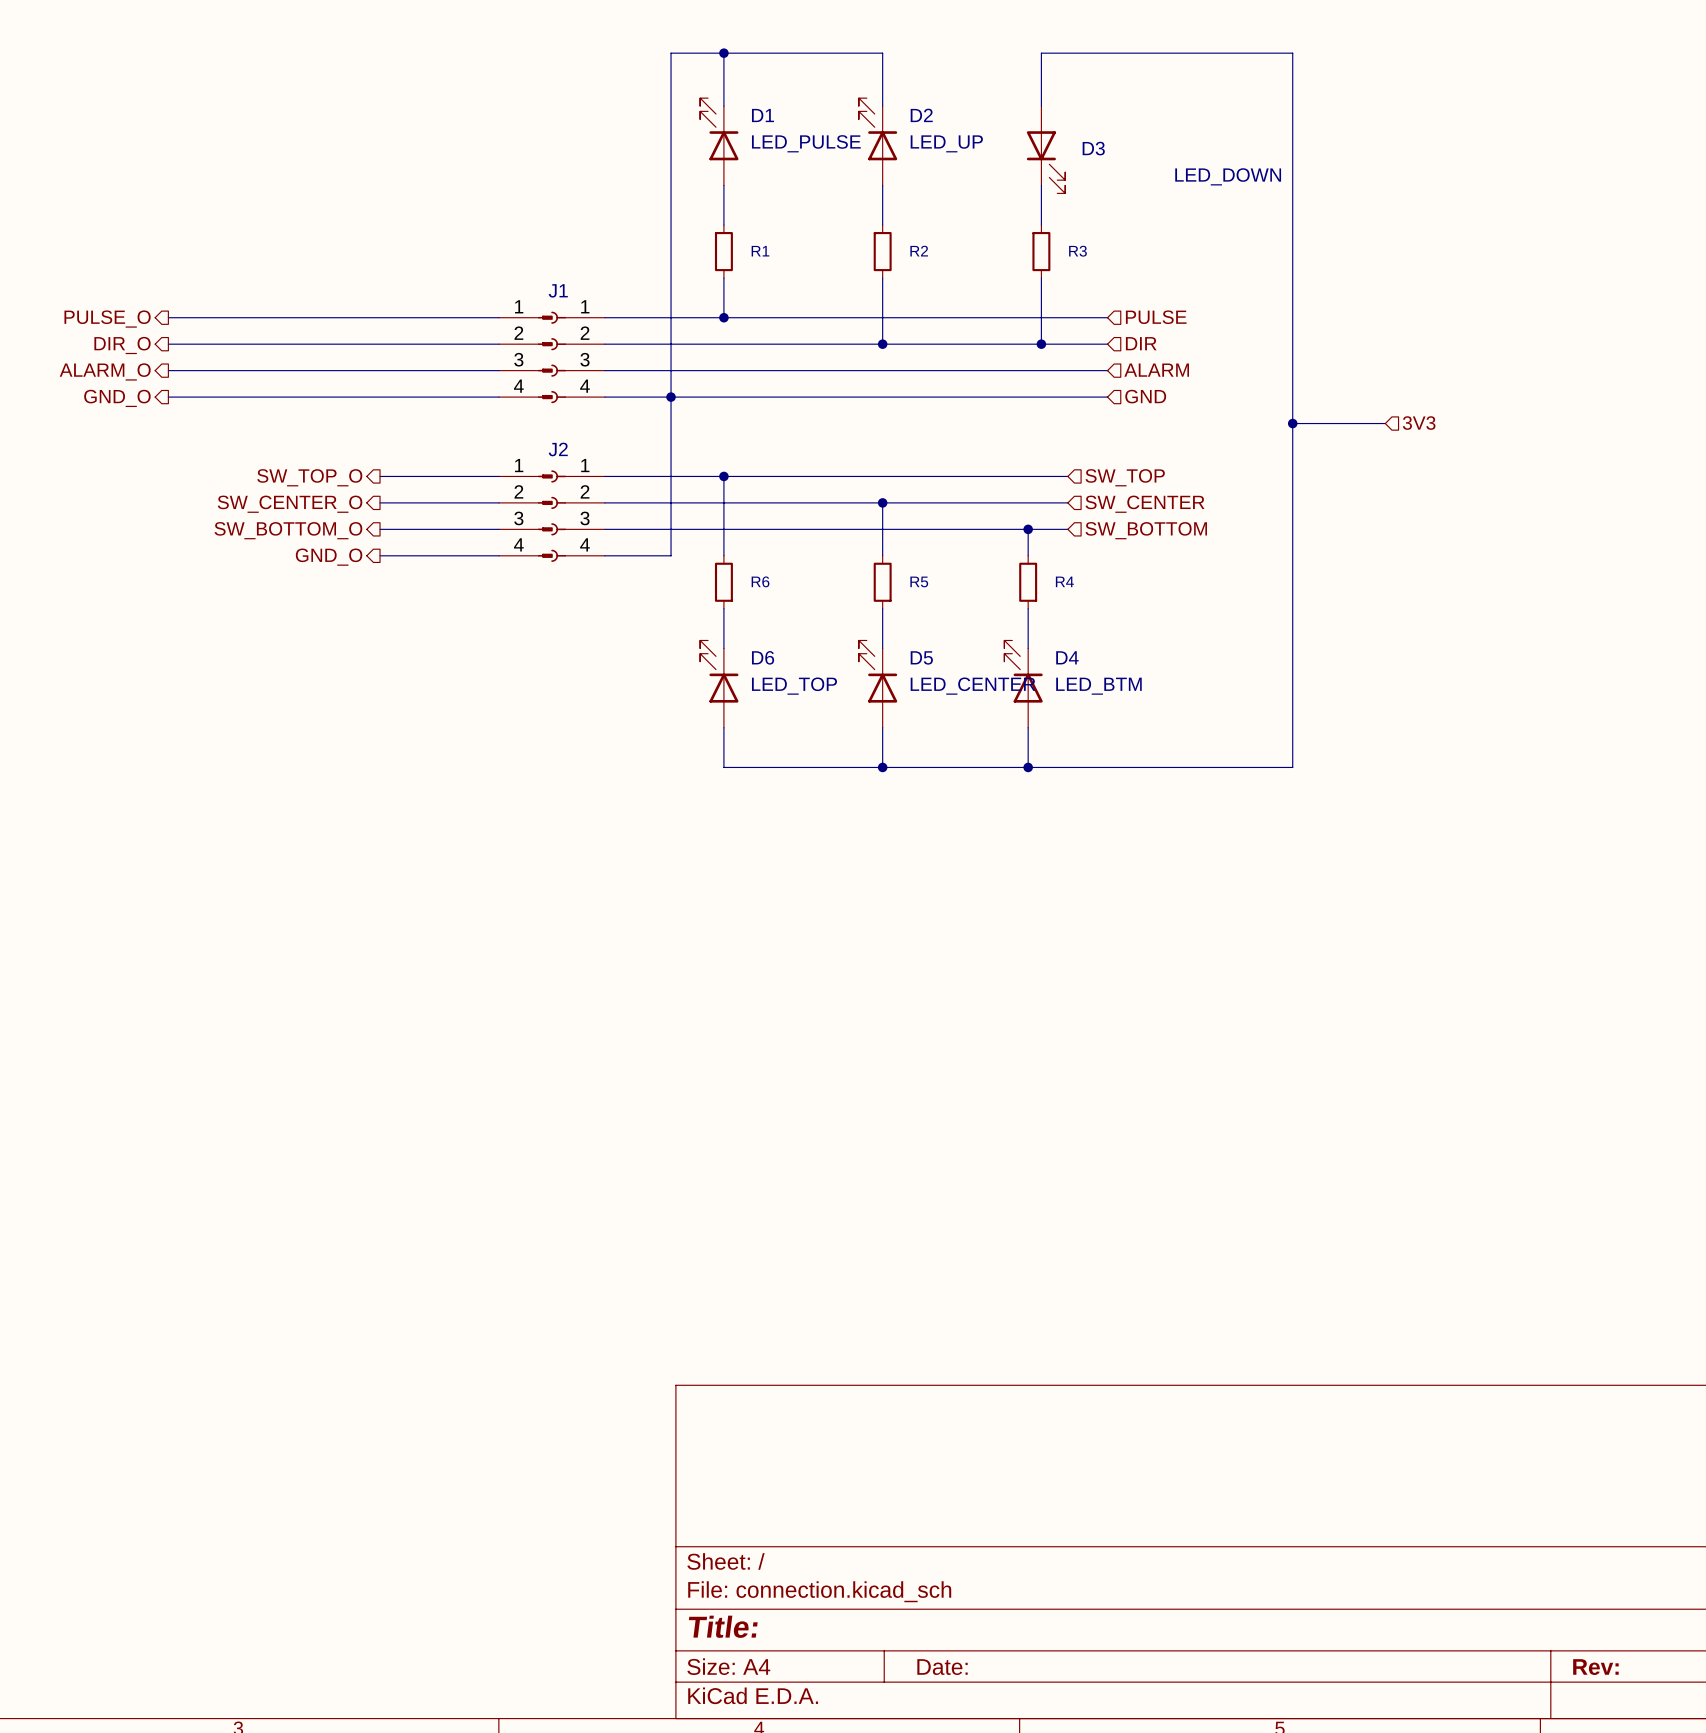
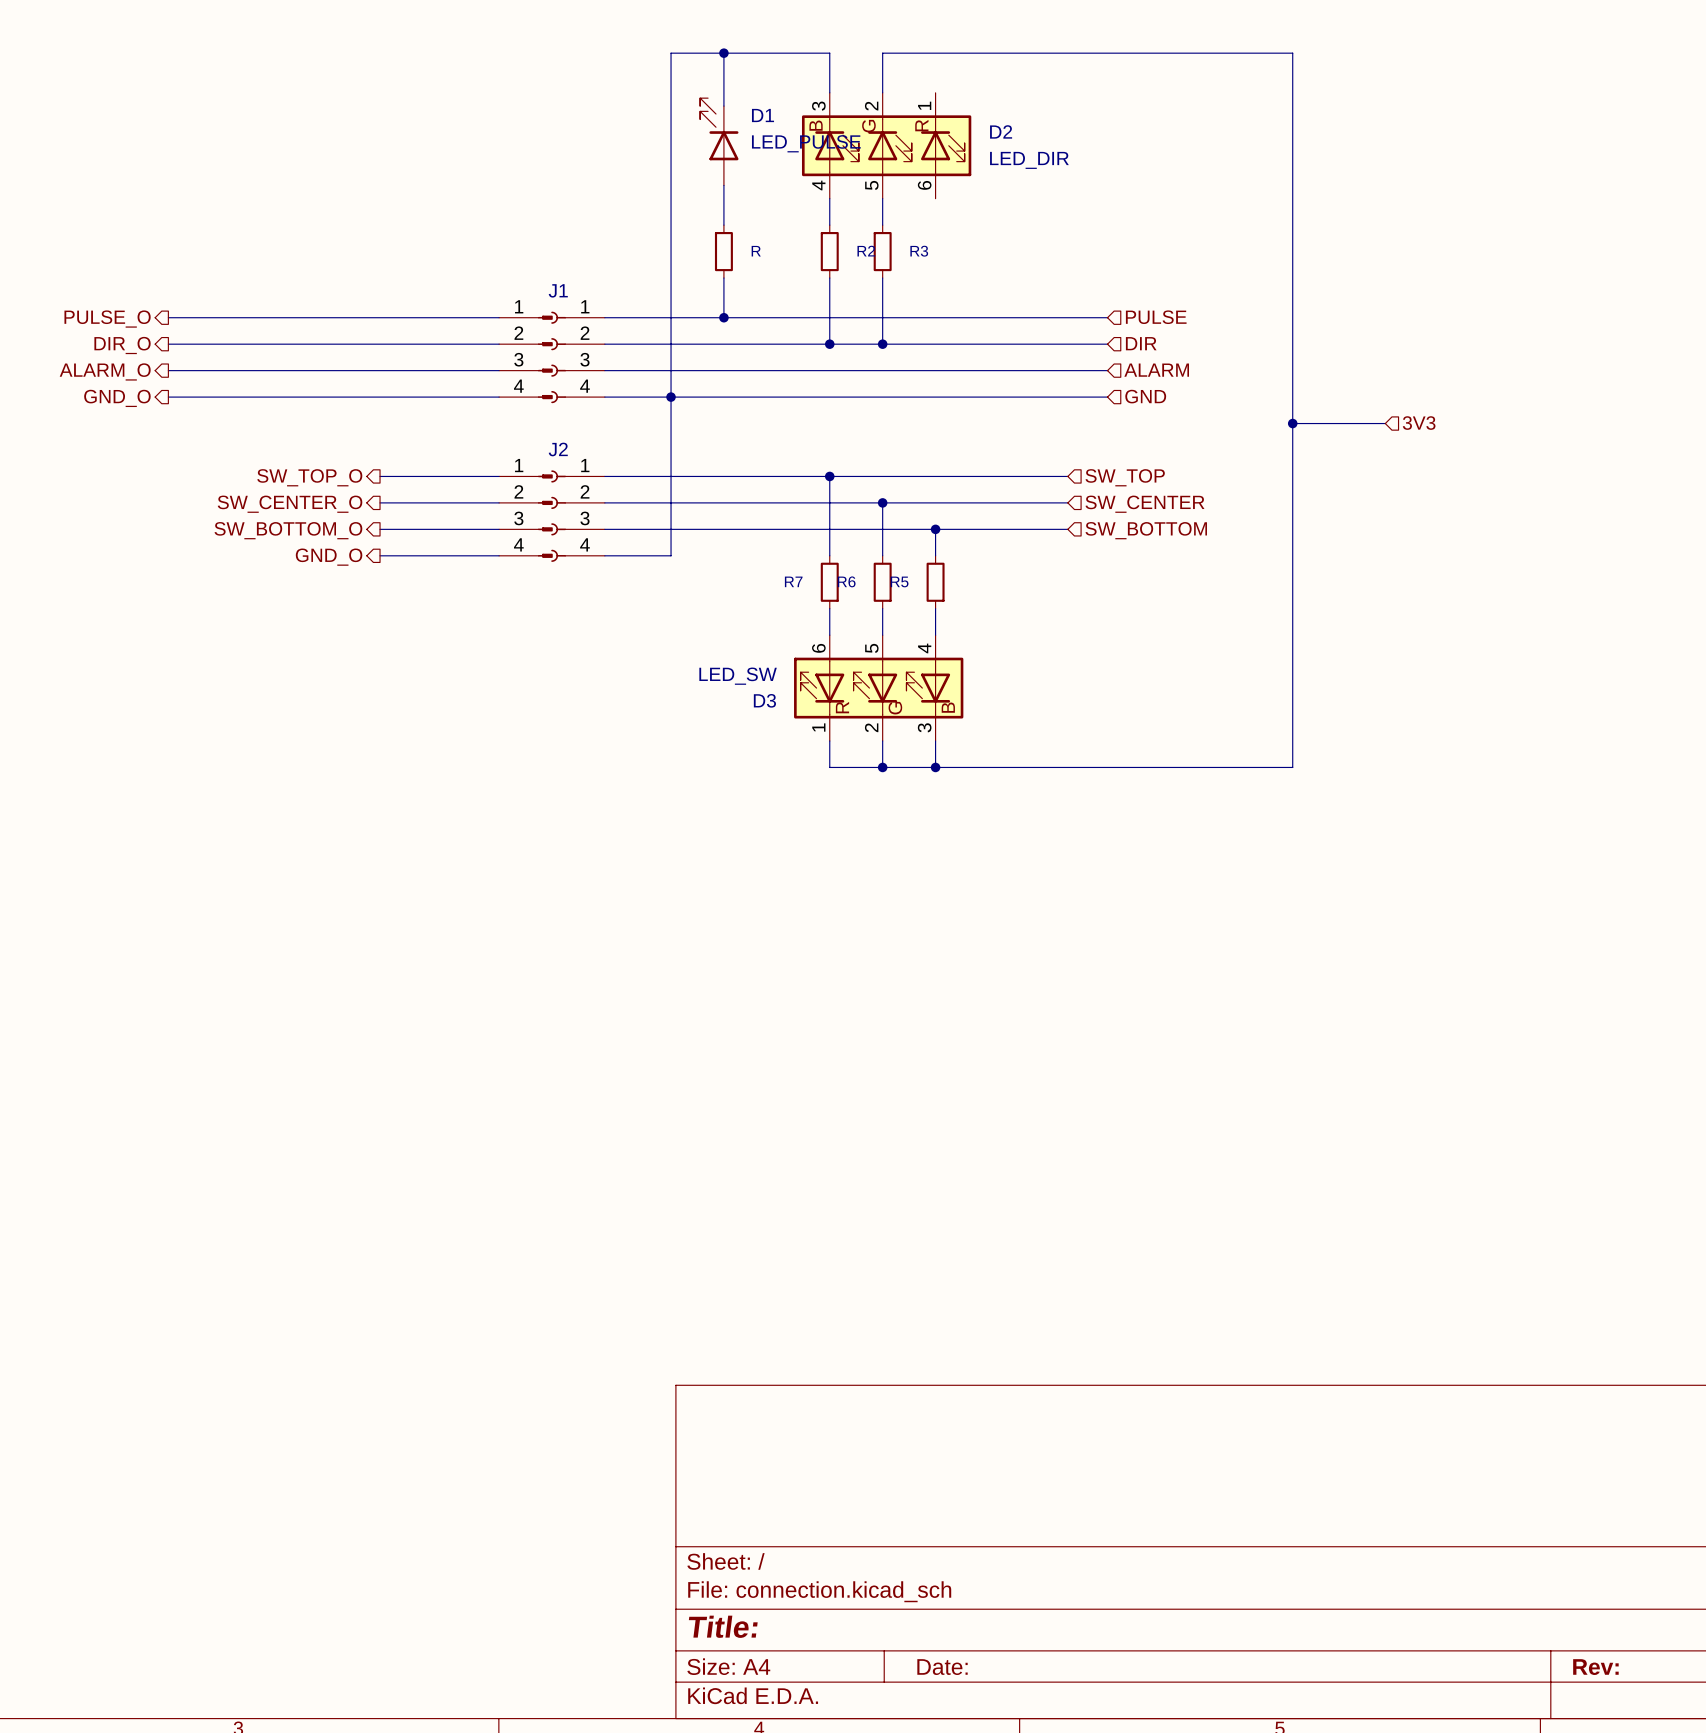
wire: (829, 53) (882, 53) -> (829, 53) (829, 92)
wire: (1041, 53) (1041, 106) -> (1041, 53) (882, 53)
D2 symbol: [858, 98, 898, 186] -> [801, 92, 972, 199]
D3 symbol: [1026, 106, 1066, 194] -> [794, 635, 964, 742]
D2 name position: D2 (921, 115) -> D2 (1001, 131)
D2 value: LED_UP (946, 143) -> LED_DIR (1029, 160)
D3 name position: D3 (1093, 148) -> D3 (764, 700)
D3 value: LED_DOWN (1228, 176) -> LED_SW (738, 676)
wire: (1041, 185) (1041, 225) -> none
wire: none -> (829, 198) (829, 225)
R1 name: R1 (760, 251) -> R (756, 251)
R2: none -> (829, 251)
R2 name: R2 (919, 251) -> R3 (919, 251)
R3: (1041, 251) -> none
wire: (1041, 278) (1041, 344) -> (829, 278) (829, 344)
junction: none -> (829, 344)
junction: (1041, 344) -> none
wire: (723, 476) (723, 555) -> (829, 476) (829, 555)
junction: (723, 476) -> none
junction: none -> (829, 476)
junction: none -> (935, 529)
wire: (1028, 529) (1028, 555) -> (935, 529) (935, 555)
junction: (1028, 529) -> none
R5 name: R5 (919, 581) -> R6 (846, 581)
R6: (723, 582) -> none
R7: none -> (829, 582)
R5: none -> (935, 582)
R4: (1028, 582) -> none
wire: (723, 608) (723, 648) -> none
wire: none -> (829, 608) (829, 635)
wire: none -> (935, 608) (935, 635)
wire: (1028, 608) (1028, 648) -> none
D6: LED_TOP (719, 684) -> none
D5: LED_CENTER (878, 684) -> none
D4: LED_BTM (1023, 684) -> none
wire: (723, 727) (723, 767) (829, 767) -> (829, 741) (829, 767)
wire: (1028, 727) (1028, 767) -> none
wire: none -> (935, 741) (935, 767)
junction: none -> (935, 767)
junction: (1028, 767) -> none

